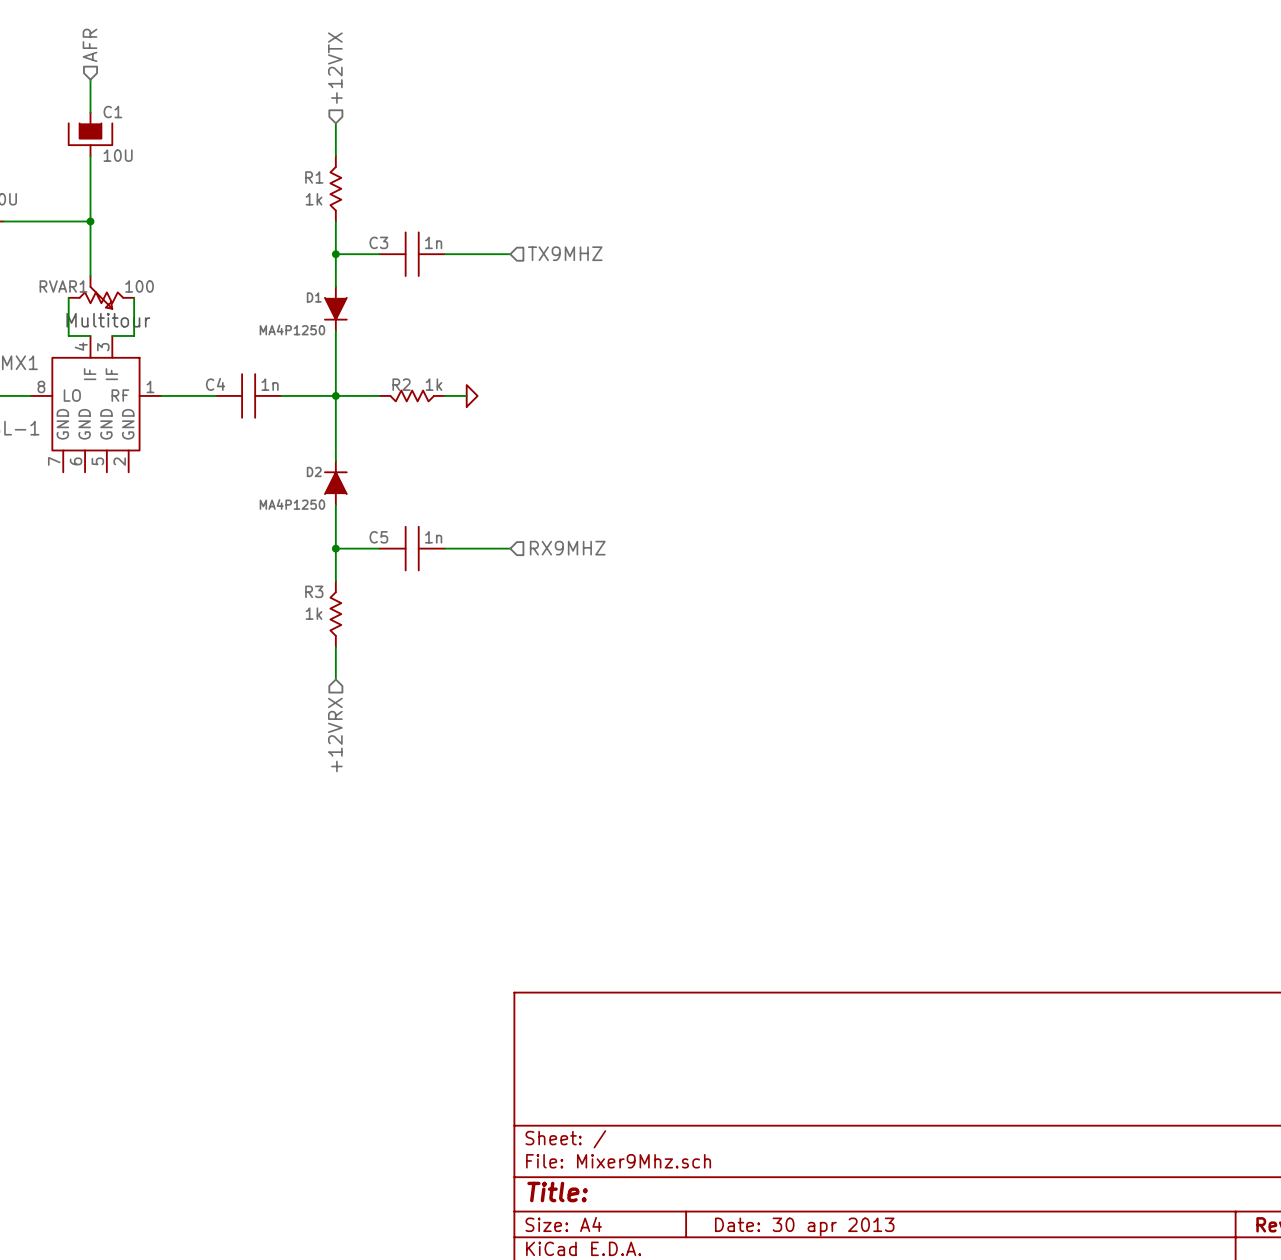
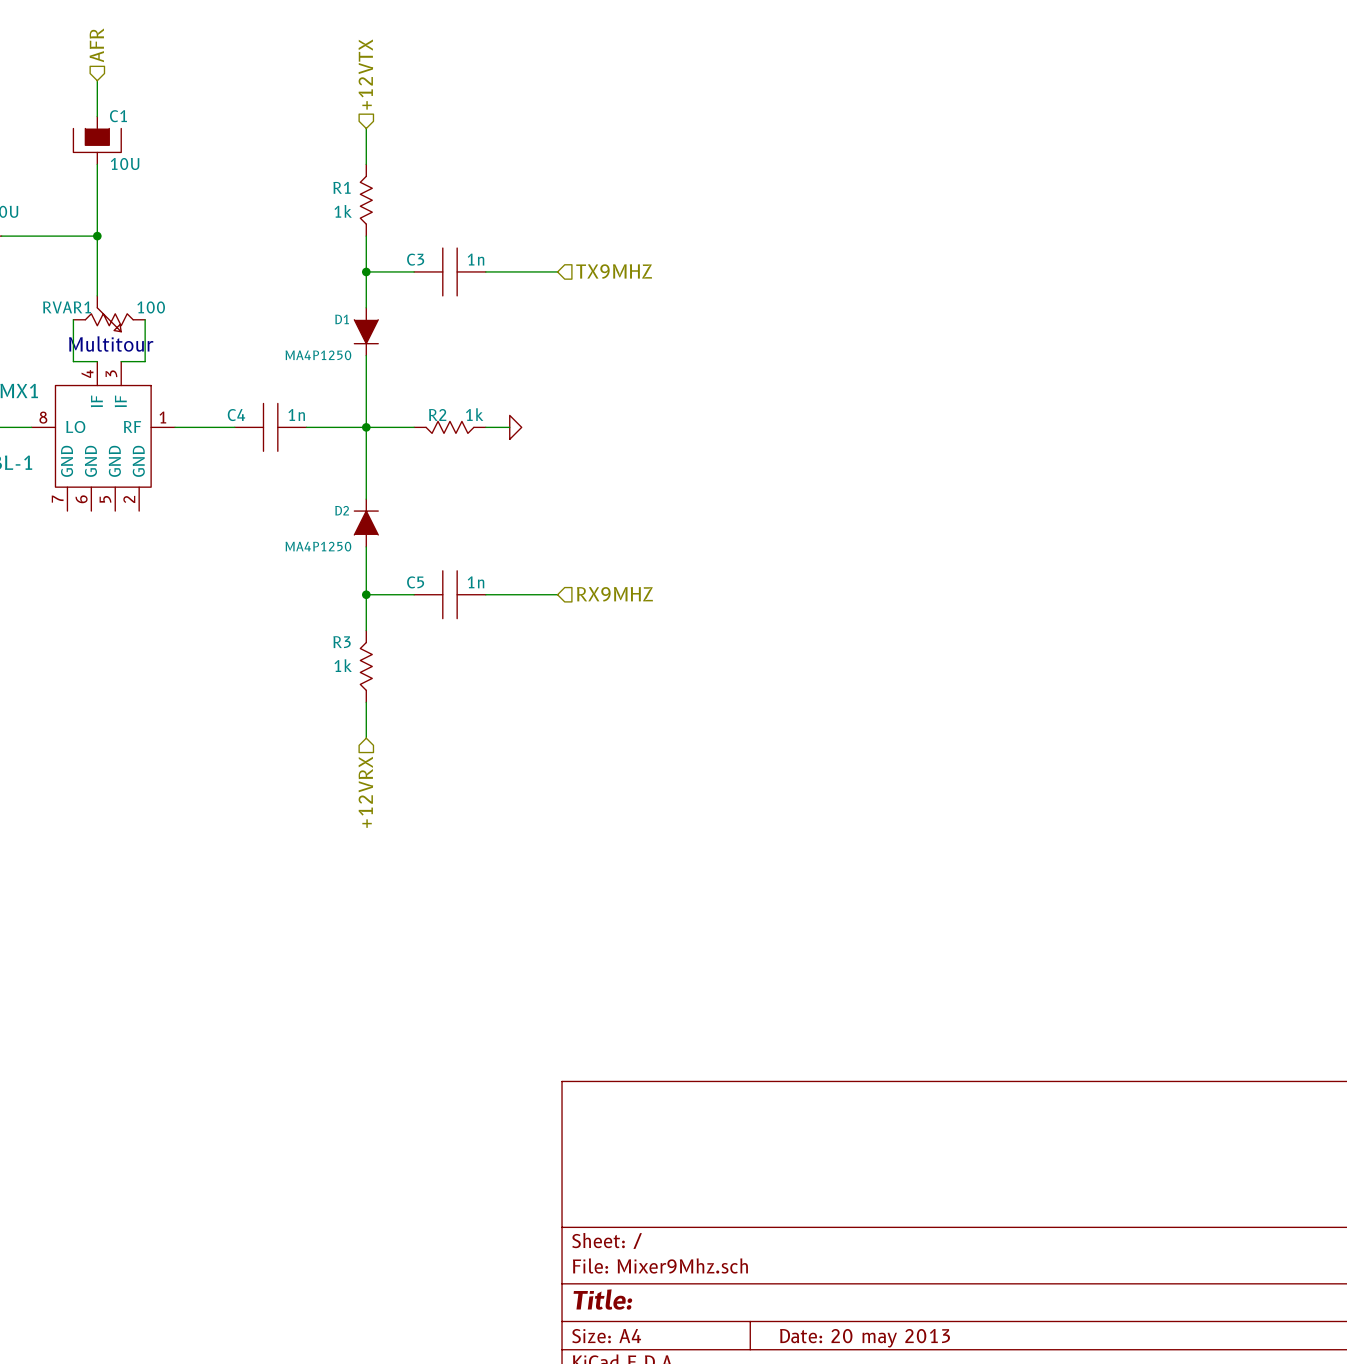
title block: Date: 30 apr 2013 (804, 1226) -> Date: 20 may 2013 (865, 1338)

